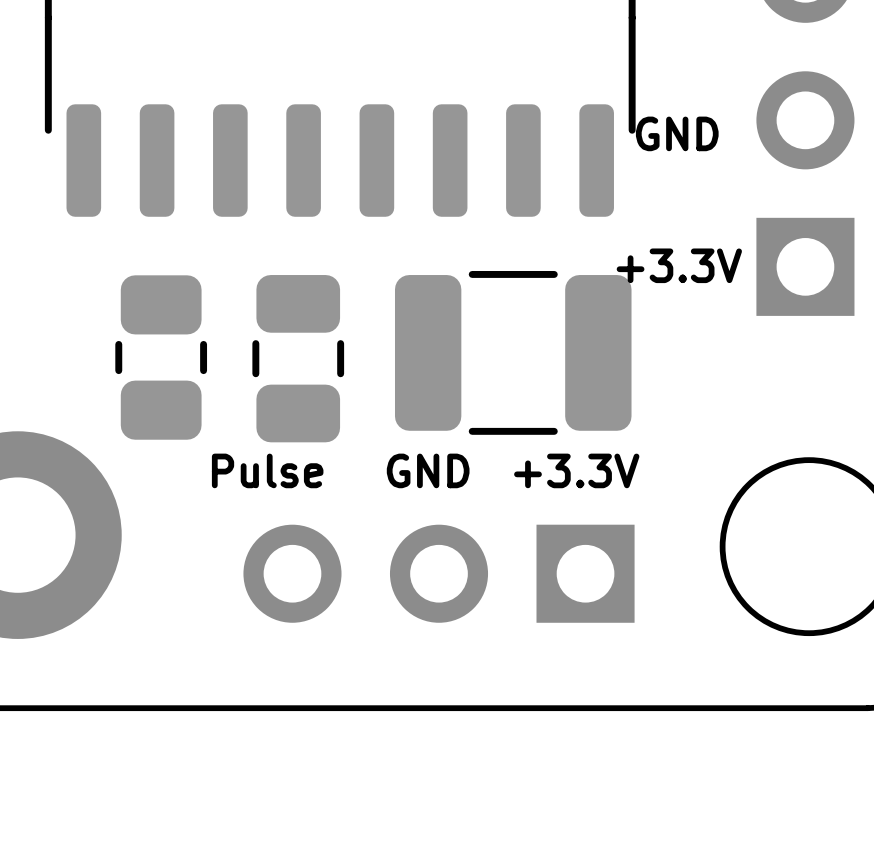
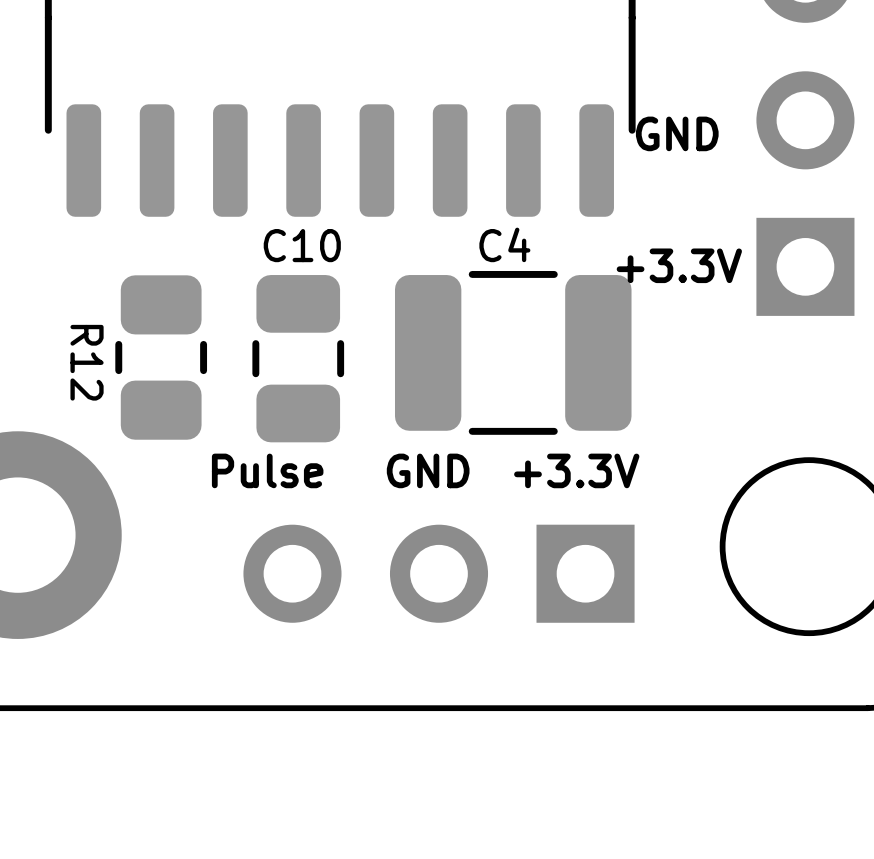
C4 name: none -> C4 (504, 244)
C10 name: none -> C10 (302, 245)
R12 name: none -> R12 (87, 362)

